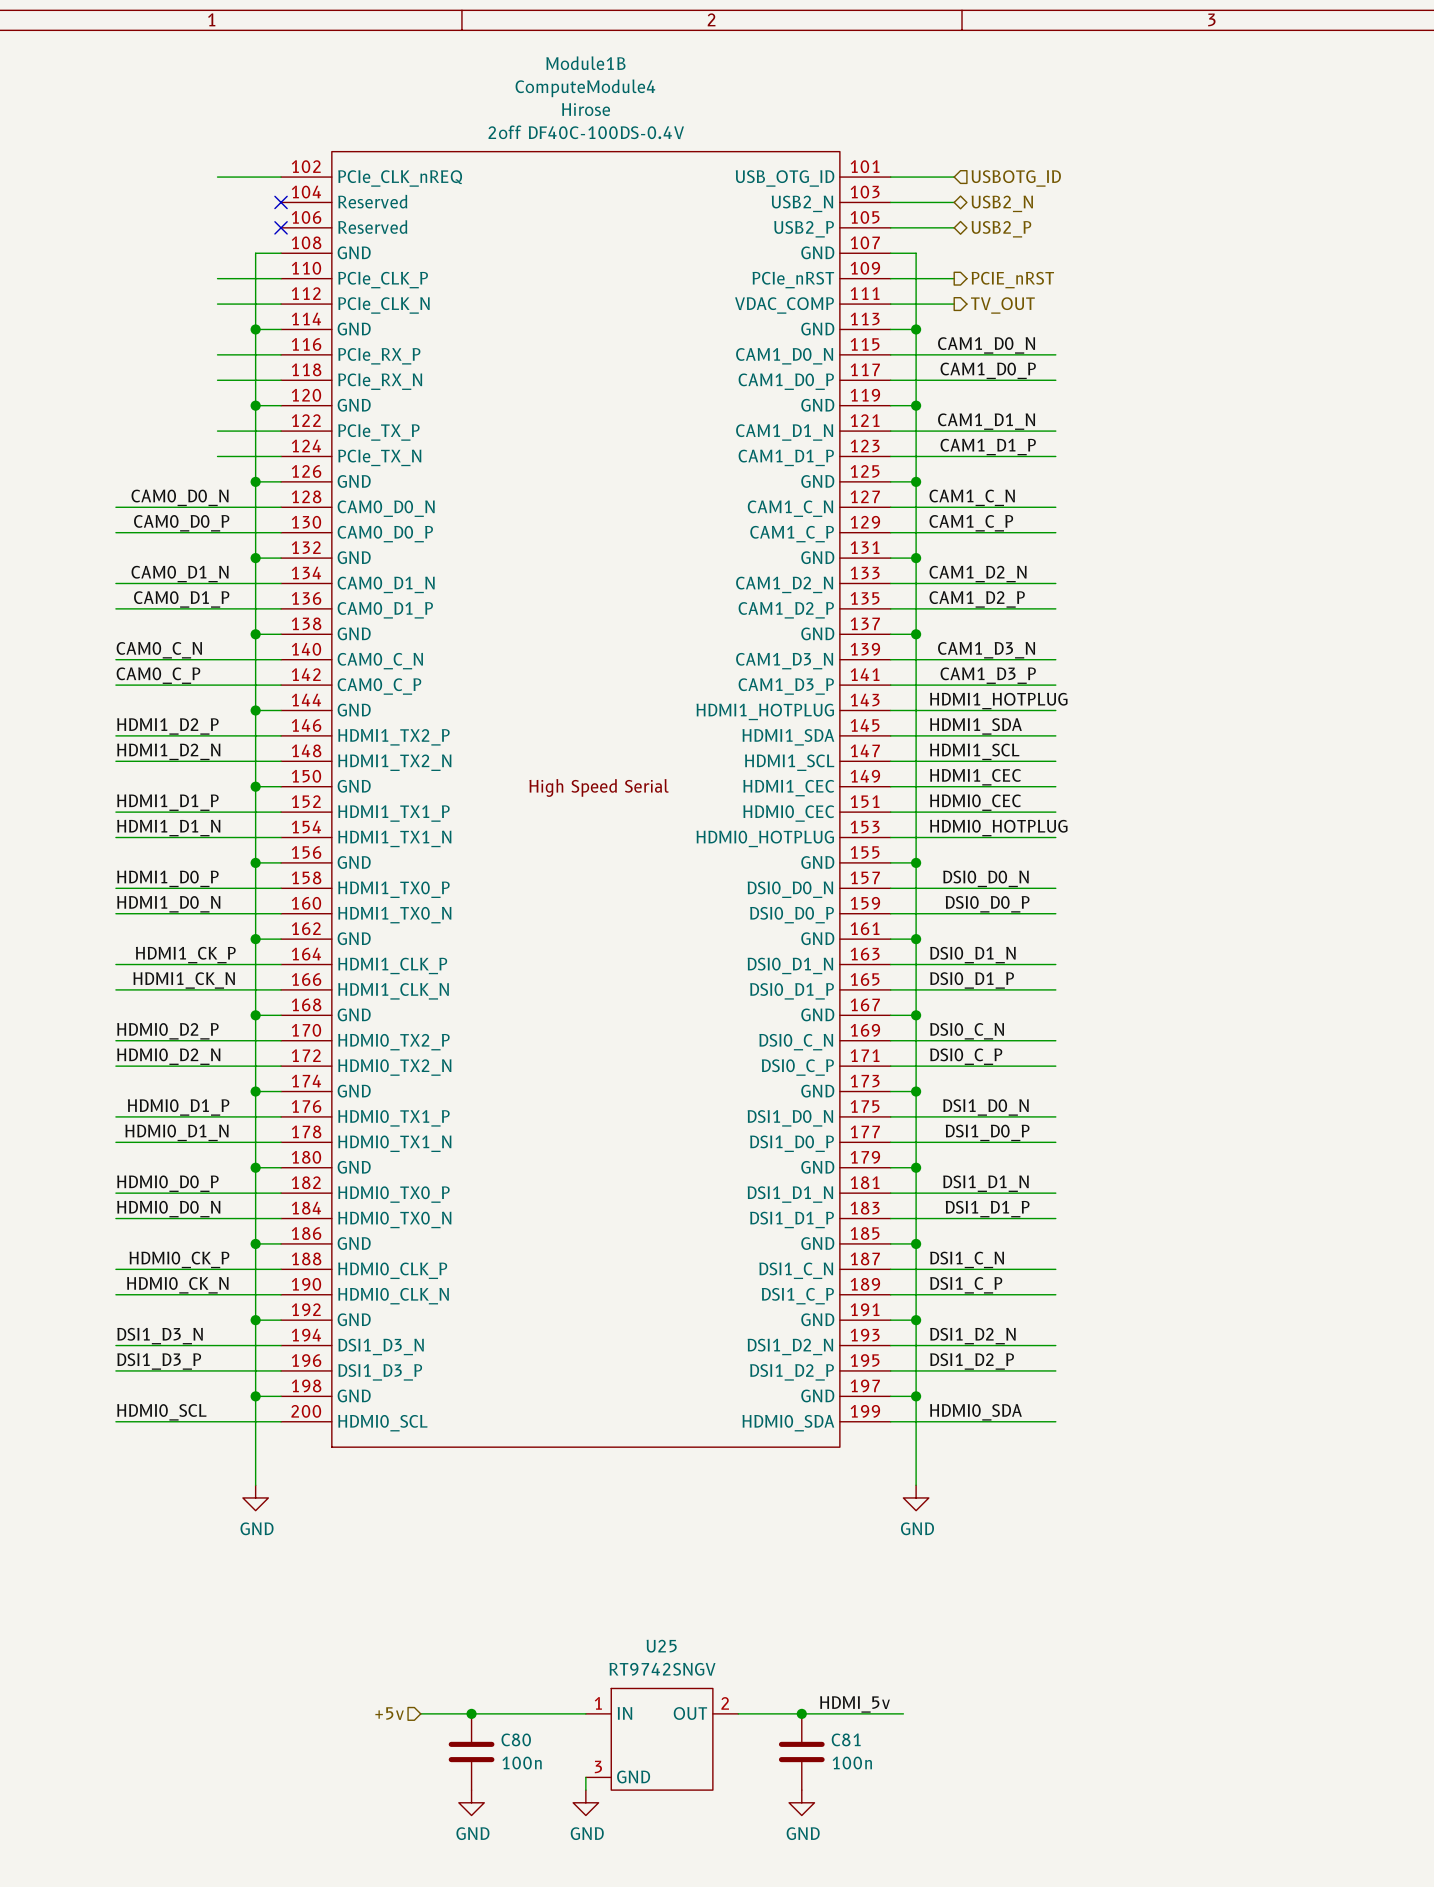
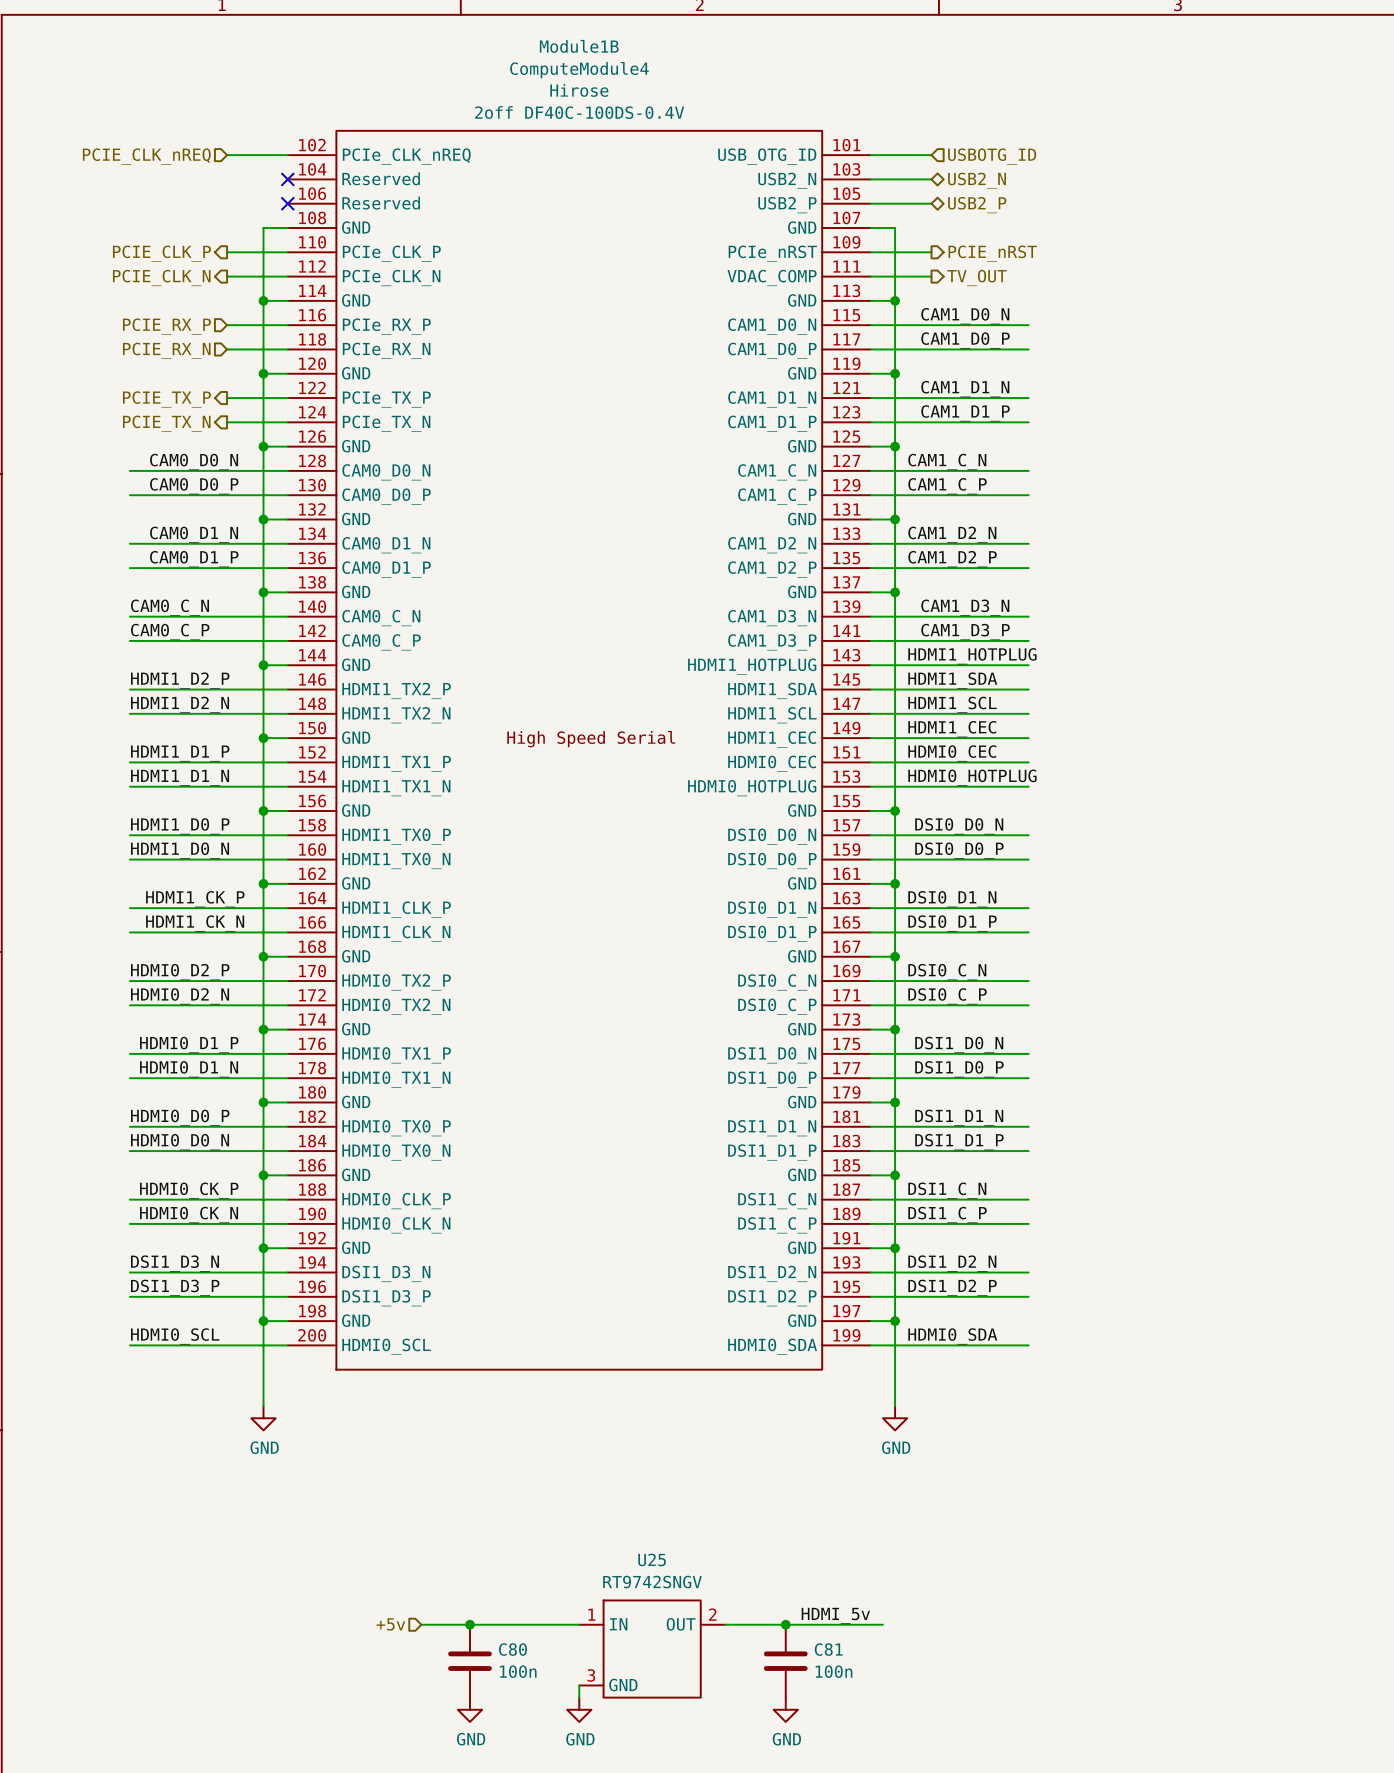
hierarchical label: none -> PCIE_CLK_nREQ (146, 156)
hierarchical label: none -> PCIE_CLK_P (161, 253)
hierarchical label: none -> PCIE_CLK_N (161, 277)
hierarchical label: none -> PCIE_RX_P (166, 326)
hierarchical label: none -> PCIE_RX_N (166, 350)
hierarchical label: none -> PCIE_TX_P (166, 399)
hierarchical label: none -> PCIE_TX_N (166, 423)

